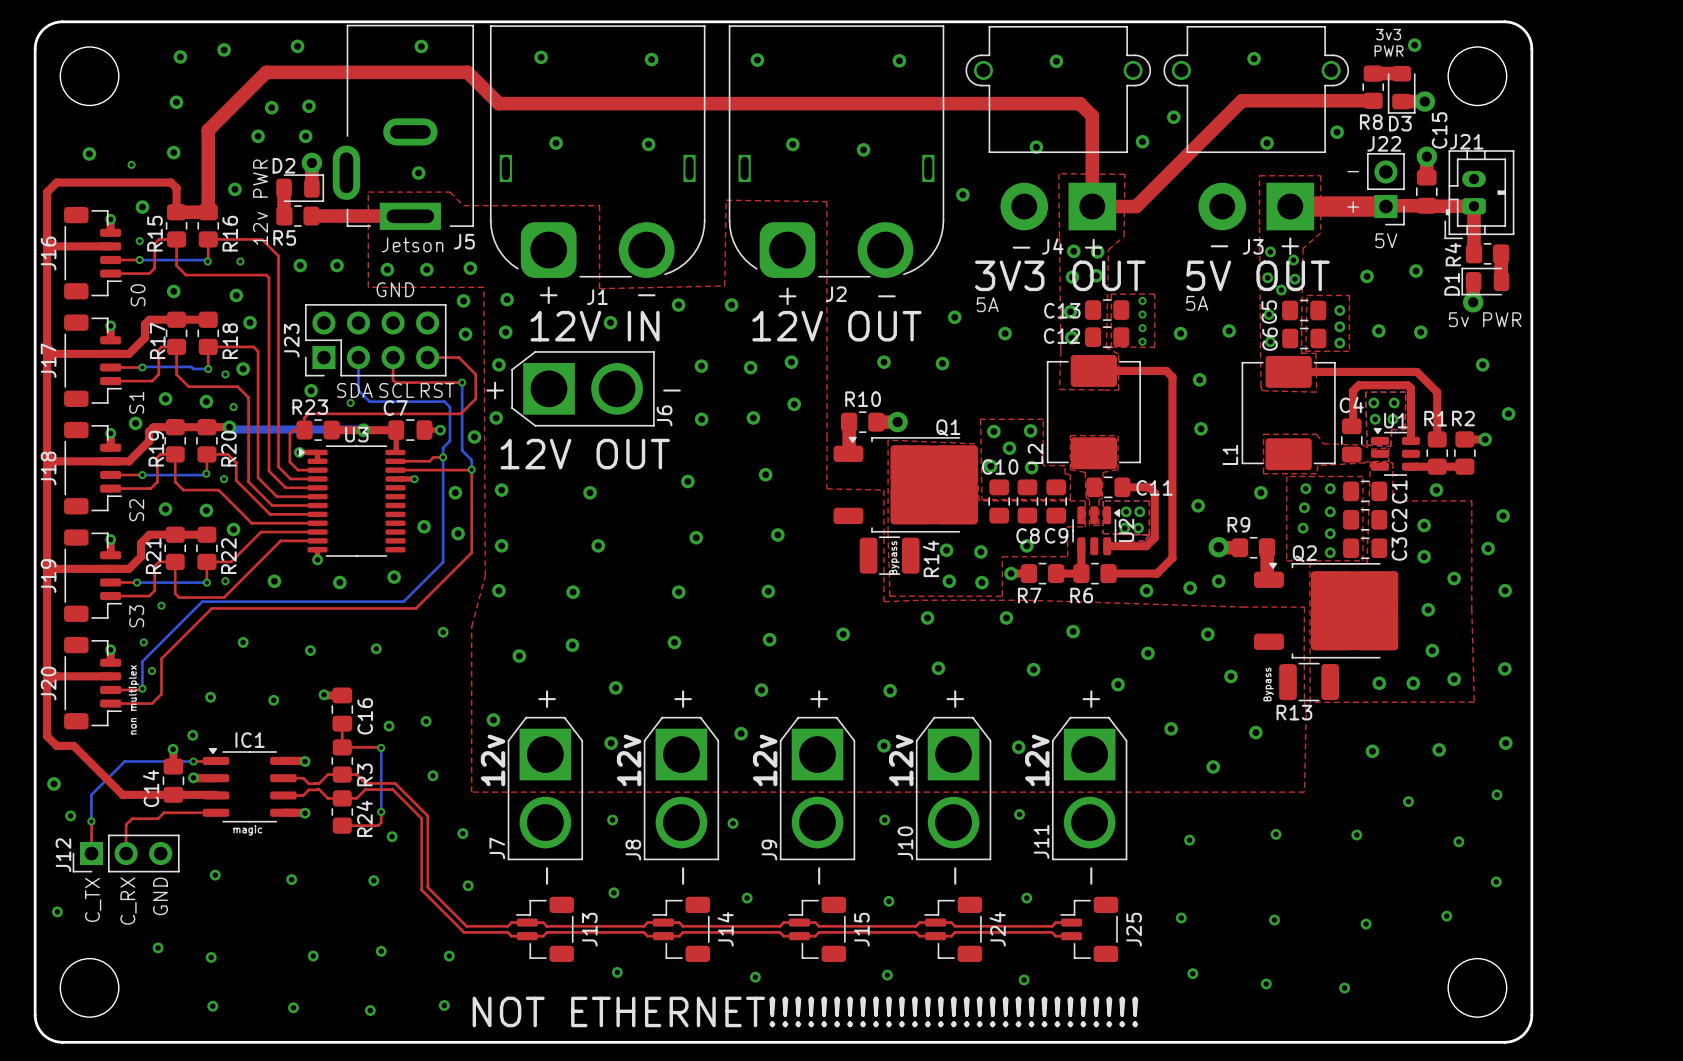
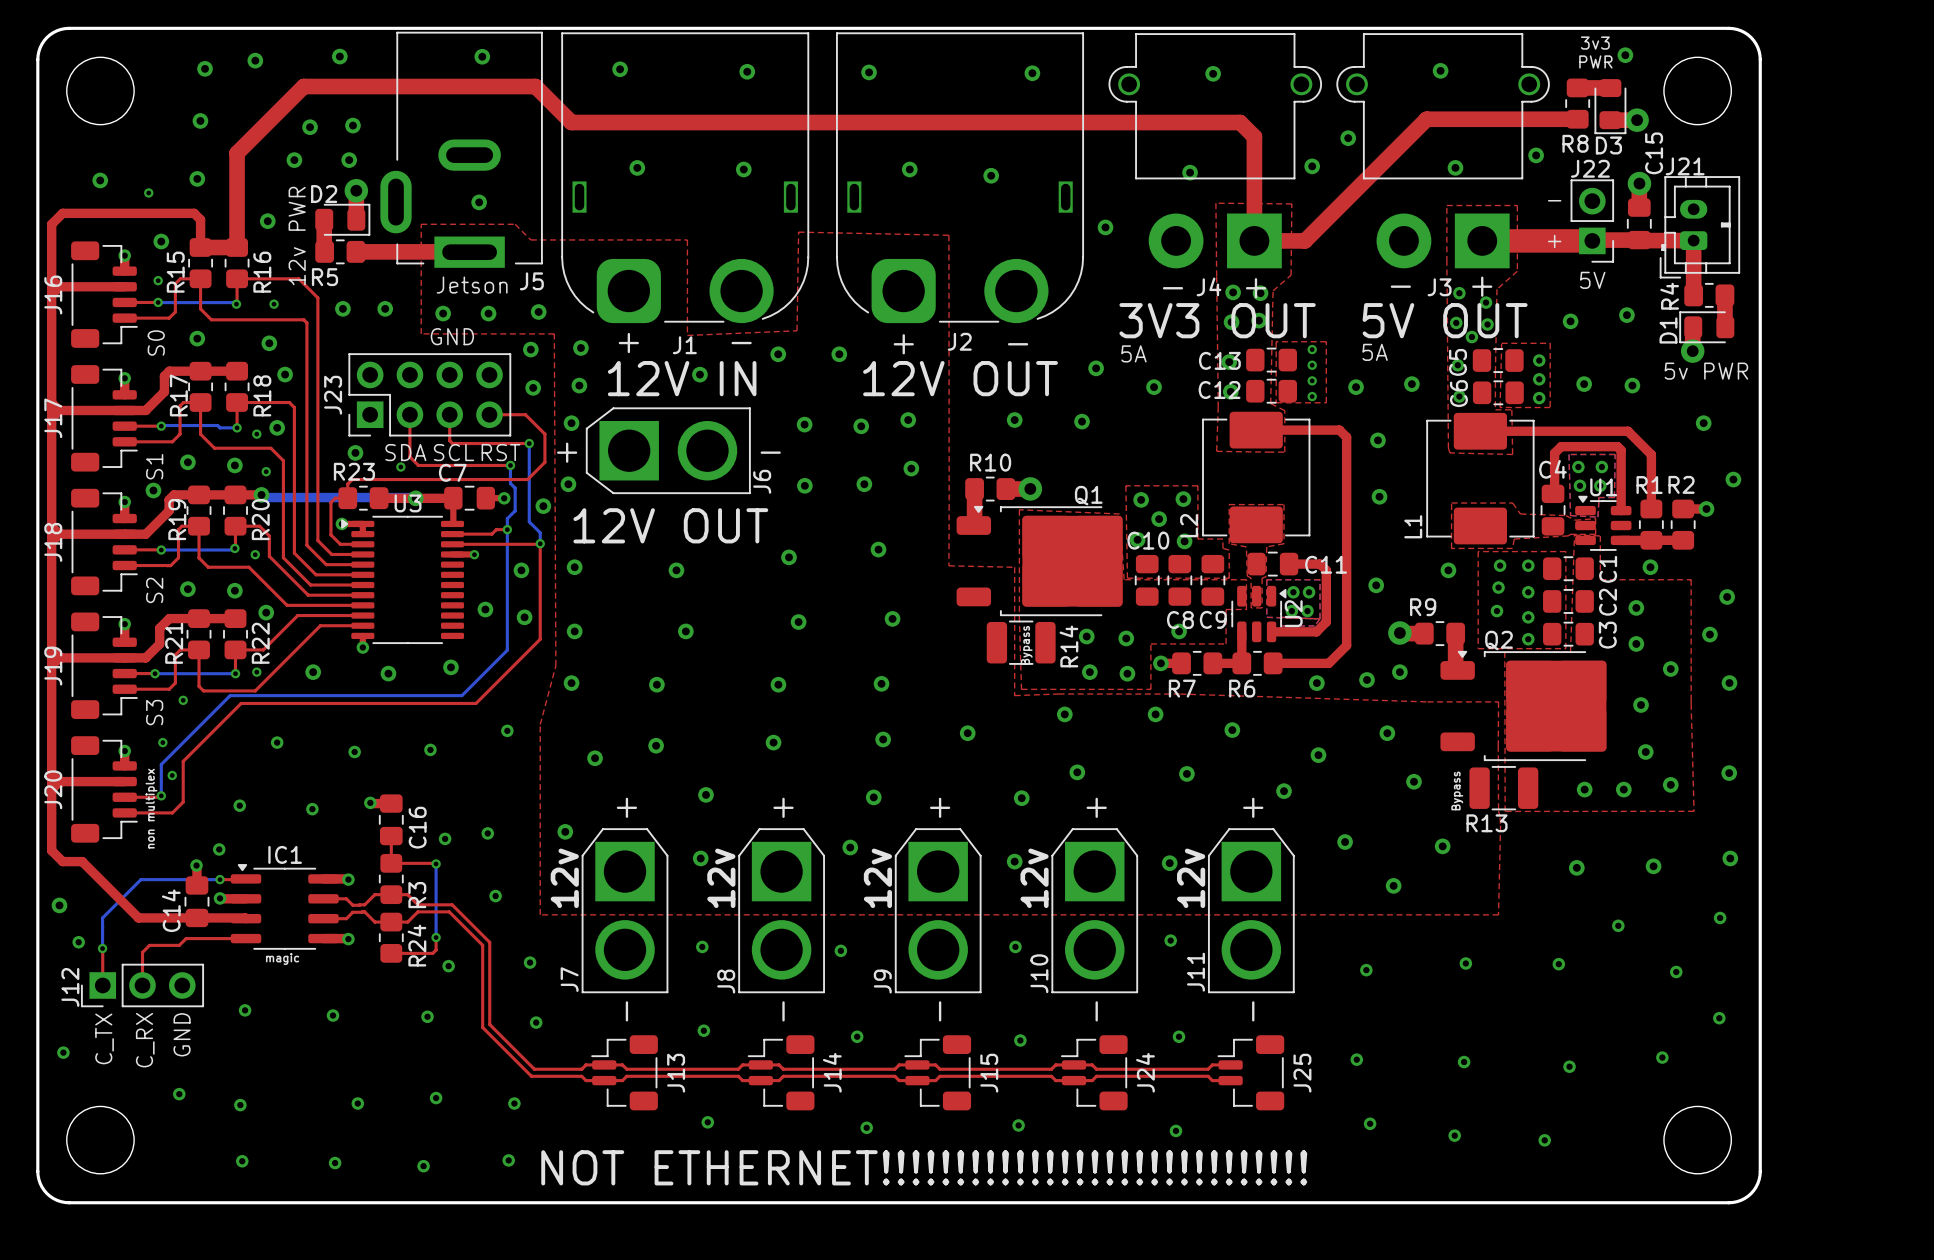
top zone outline: (826, 201) (726, 200) (724, 285) (599, 288) -> (948, 235) (798, 232) (797, 330) (687, 335)
top track: none -> (409, 414) (409, 456) (418, 465) (510, 465)
bottom track: (358, 357) (358, 390) (369, 401) (444, 401) (449, 407) (449, 421) -> (510, 465) (510, 483) (515, 488)
via: none -> (510, 465)

